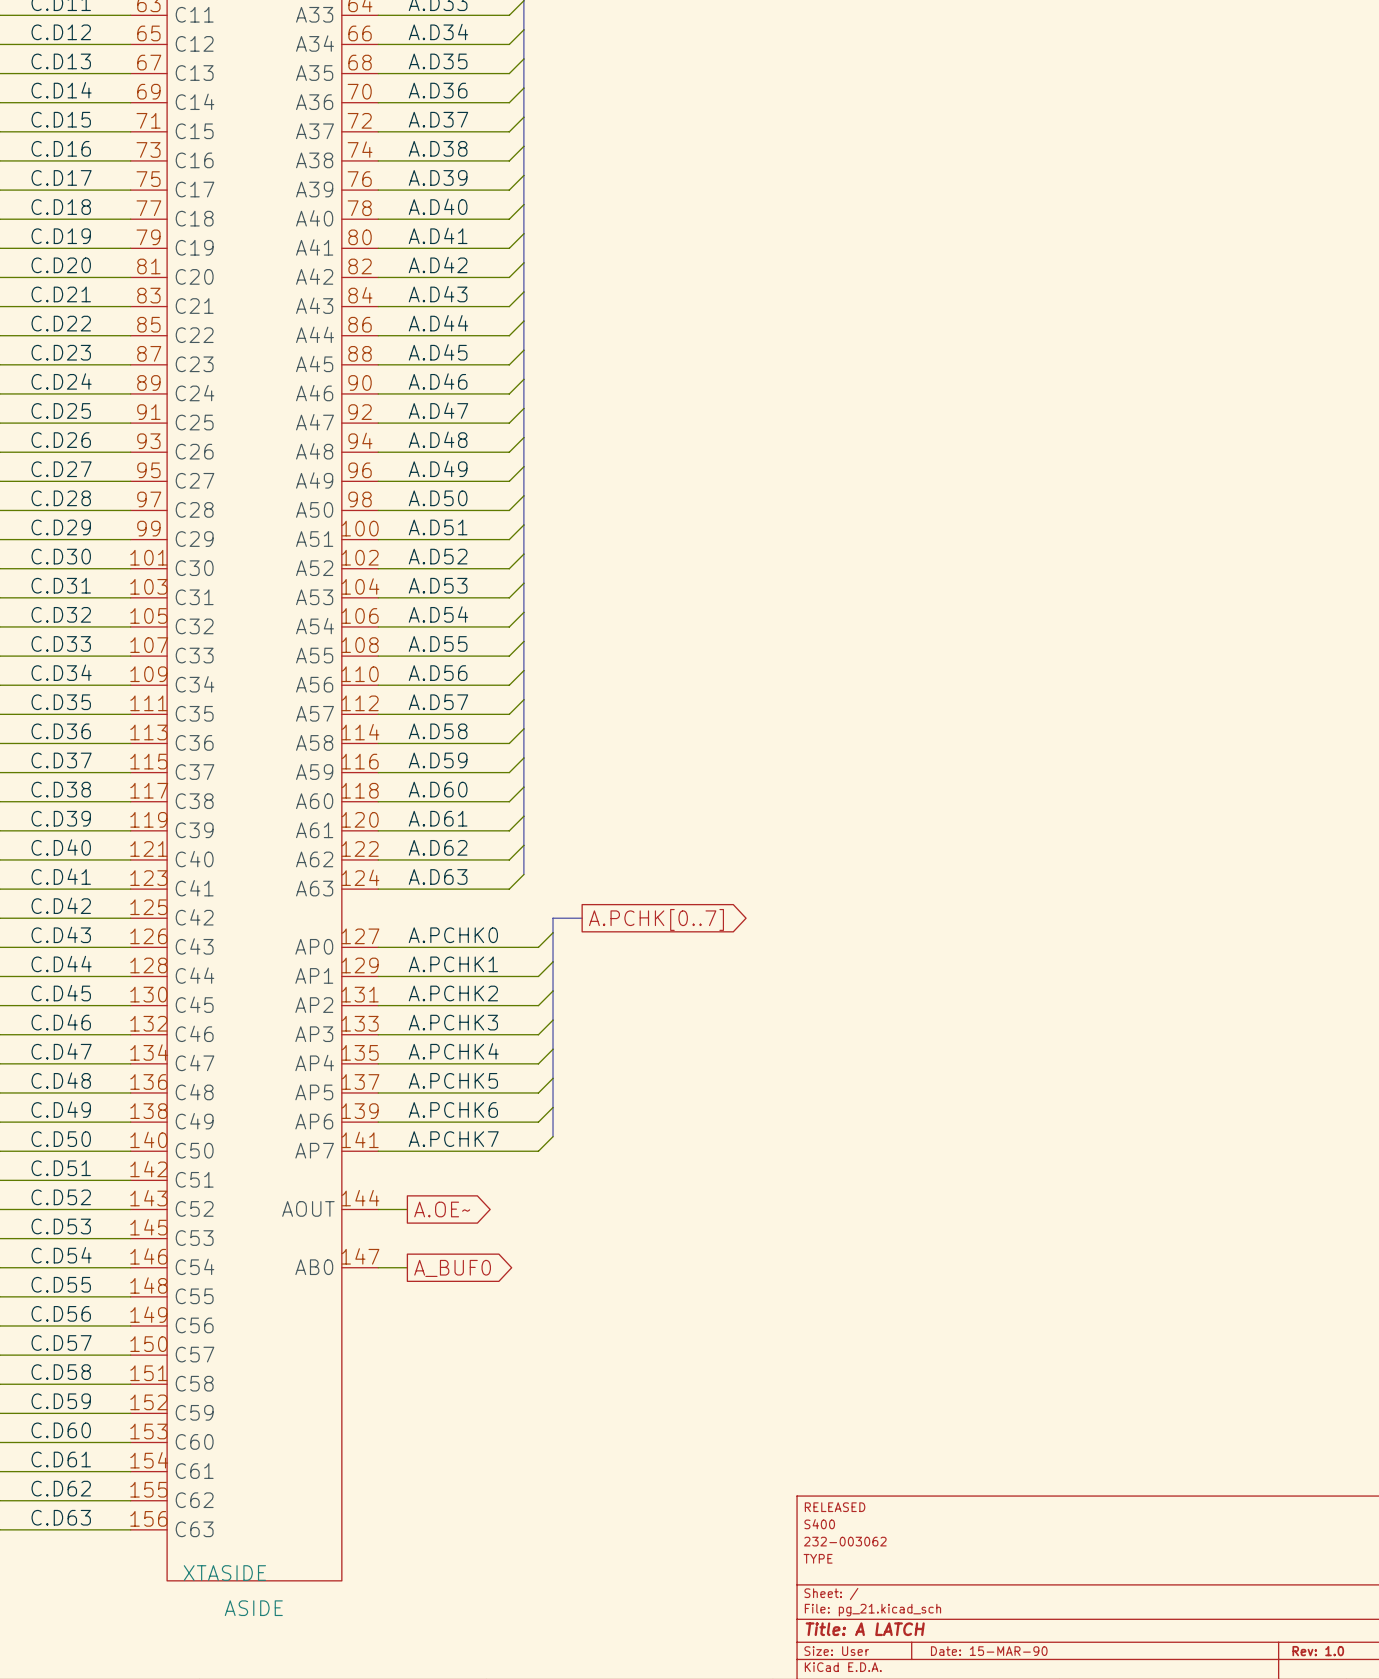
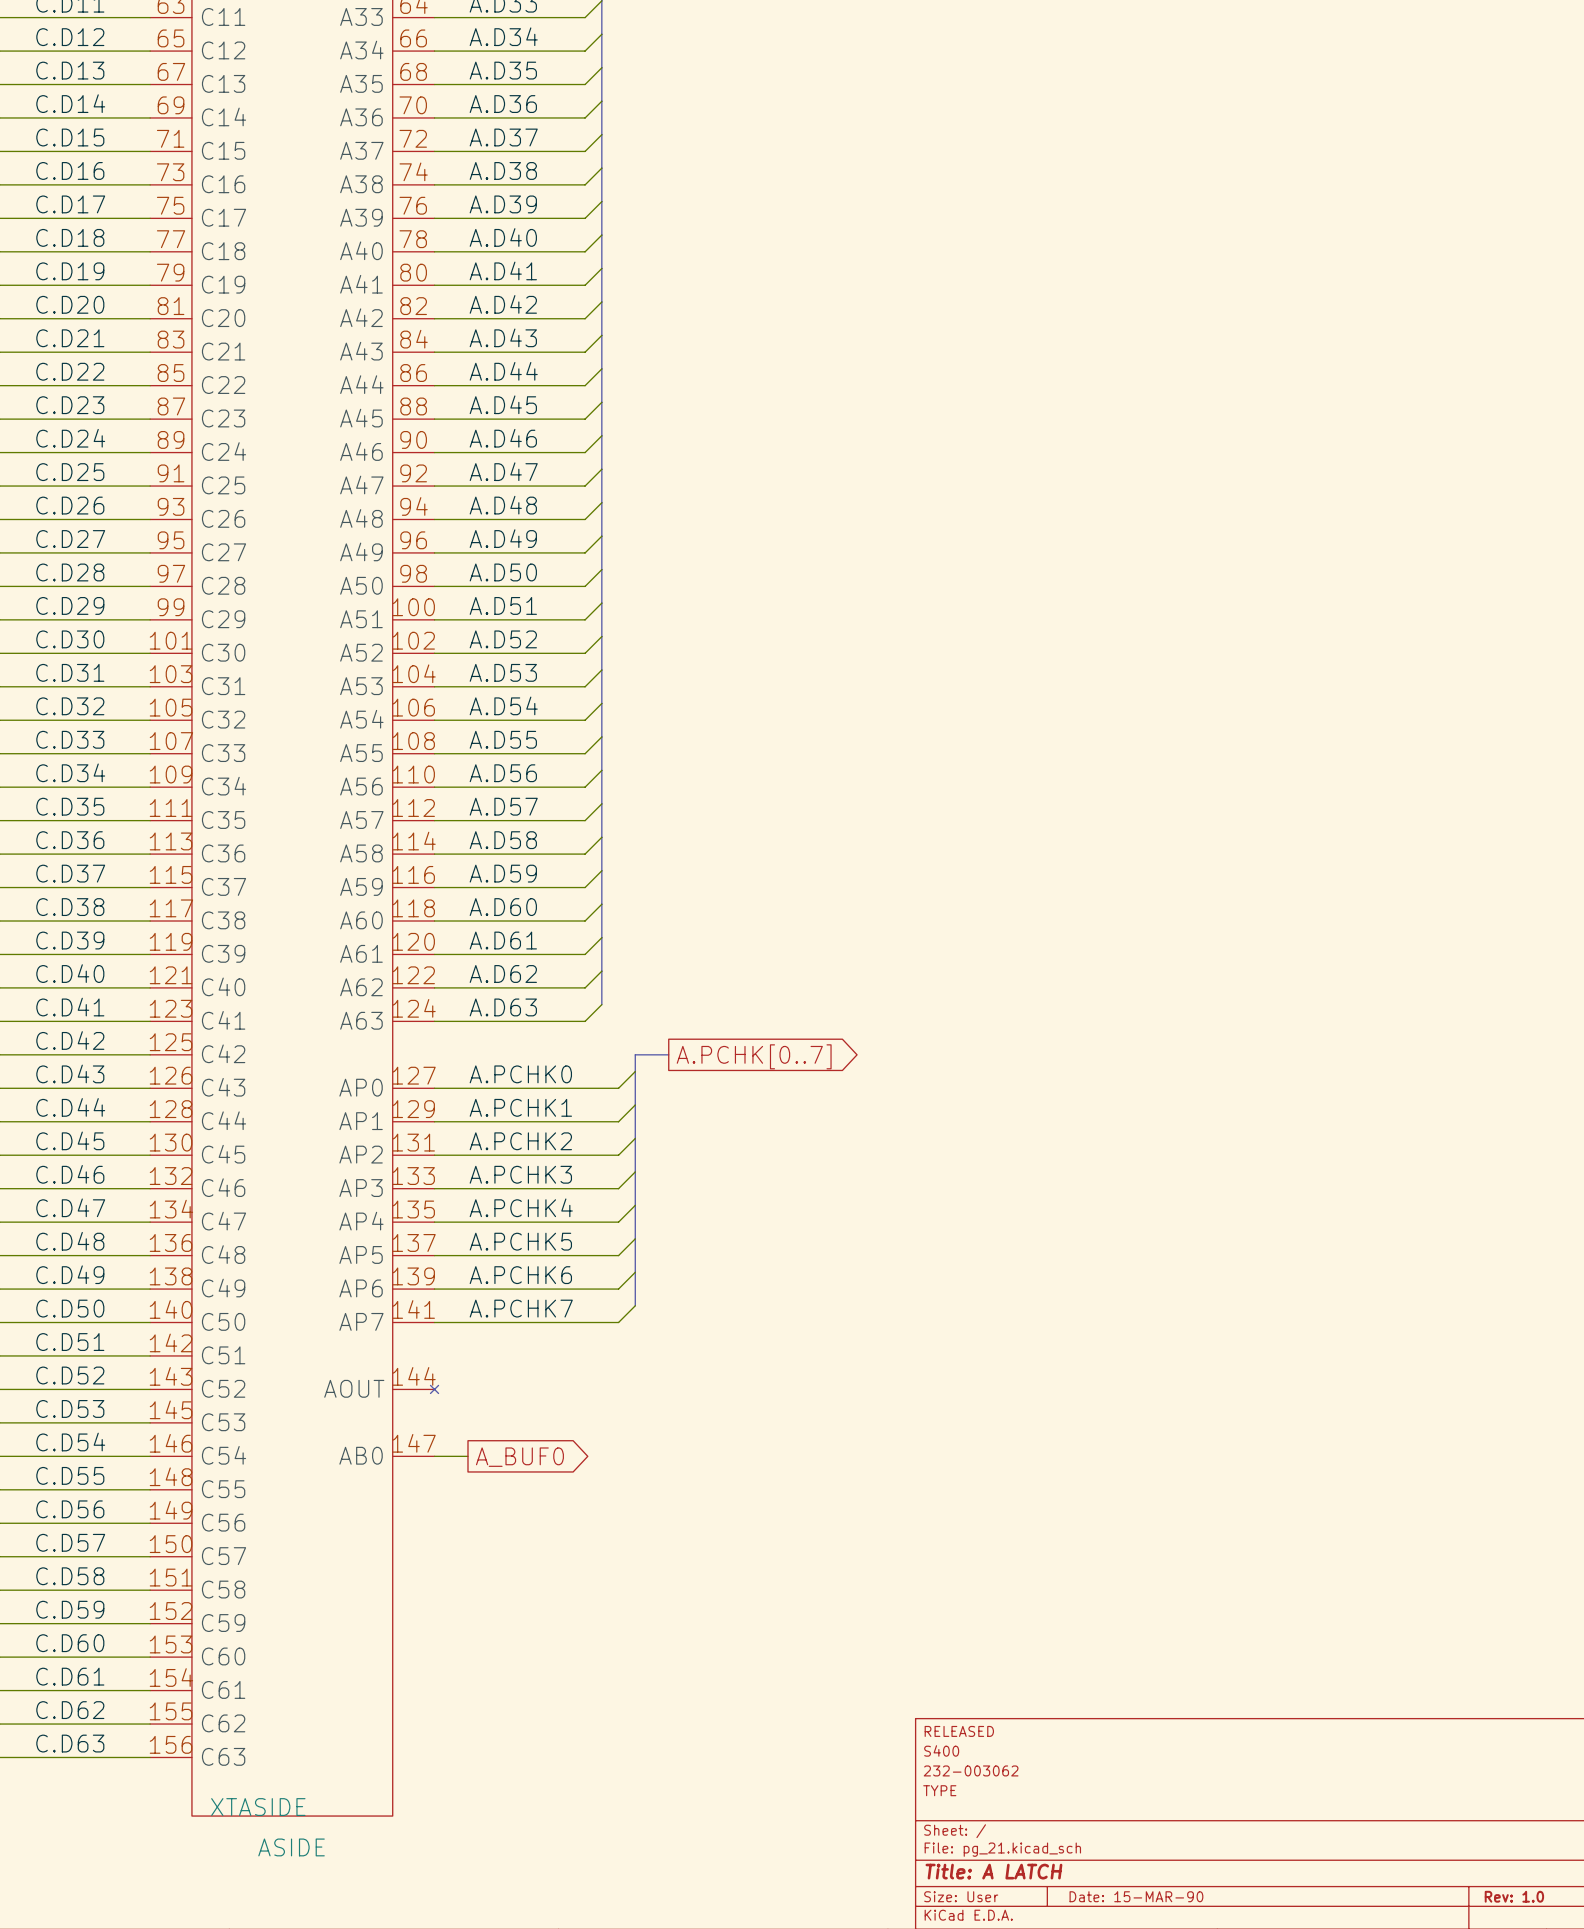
wire: (378, 1209) (407, 1209) -> none
no-connect mark: none -> (434, 1389)
global label: A.OE~ (442, 1209) -> none

